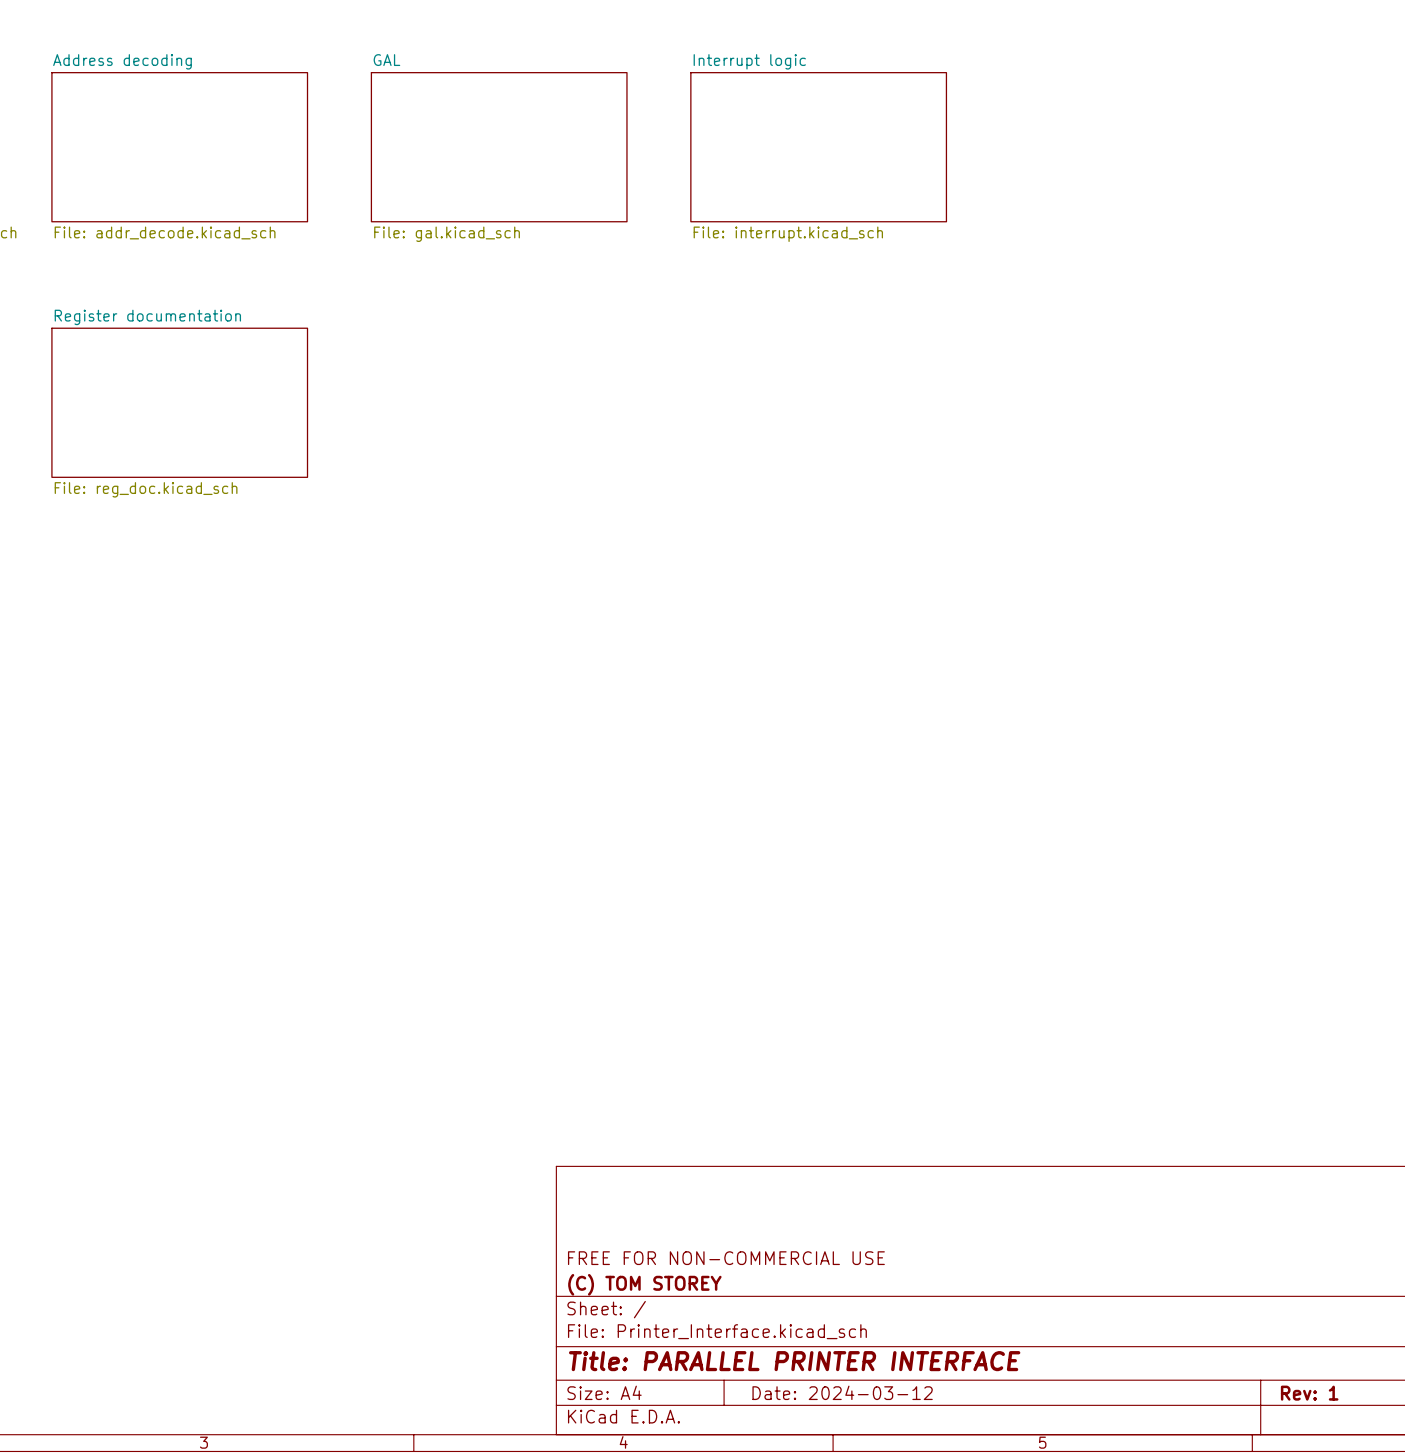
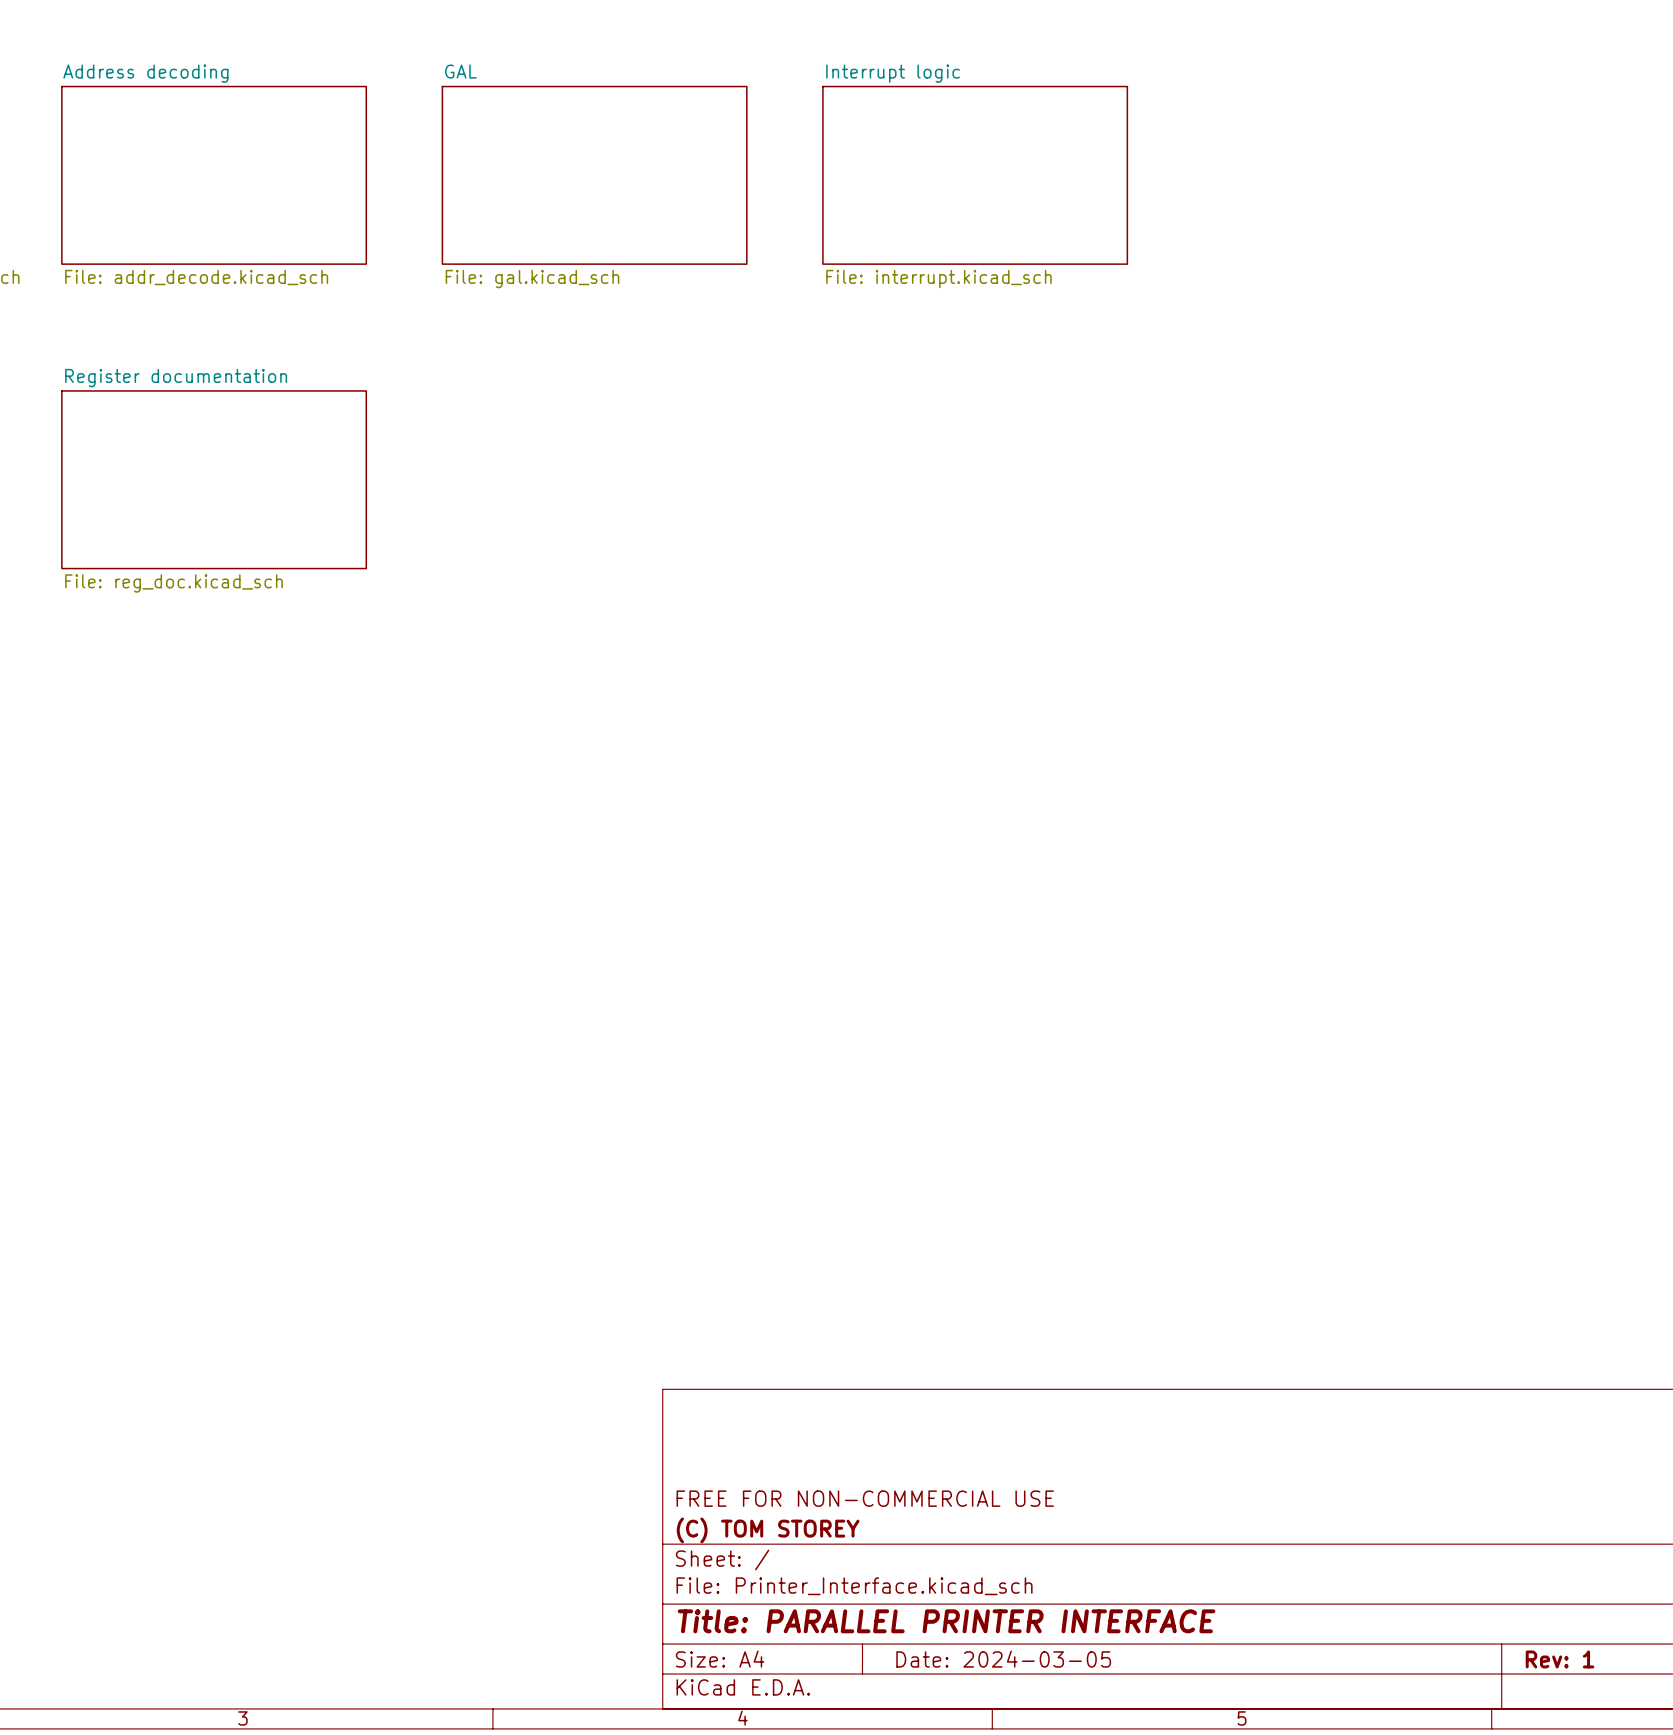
title block: Date: 2024-03-12 (842, 1392) -> Date: 2024-03-05 (1003, 1659)

